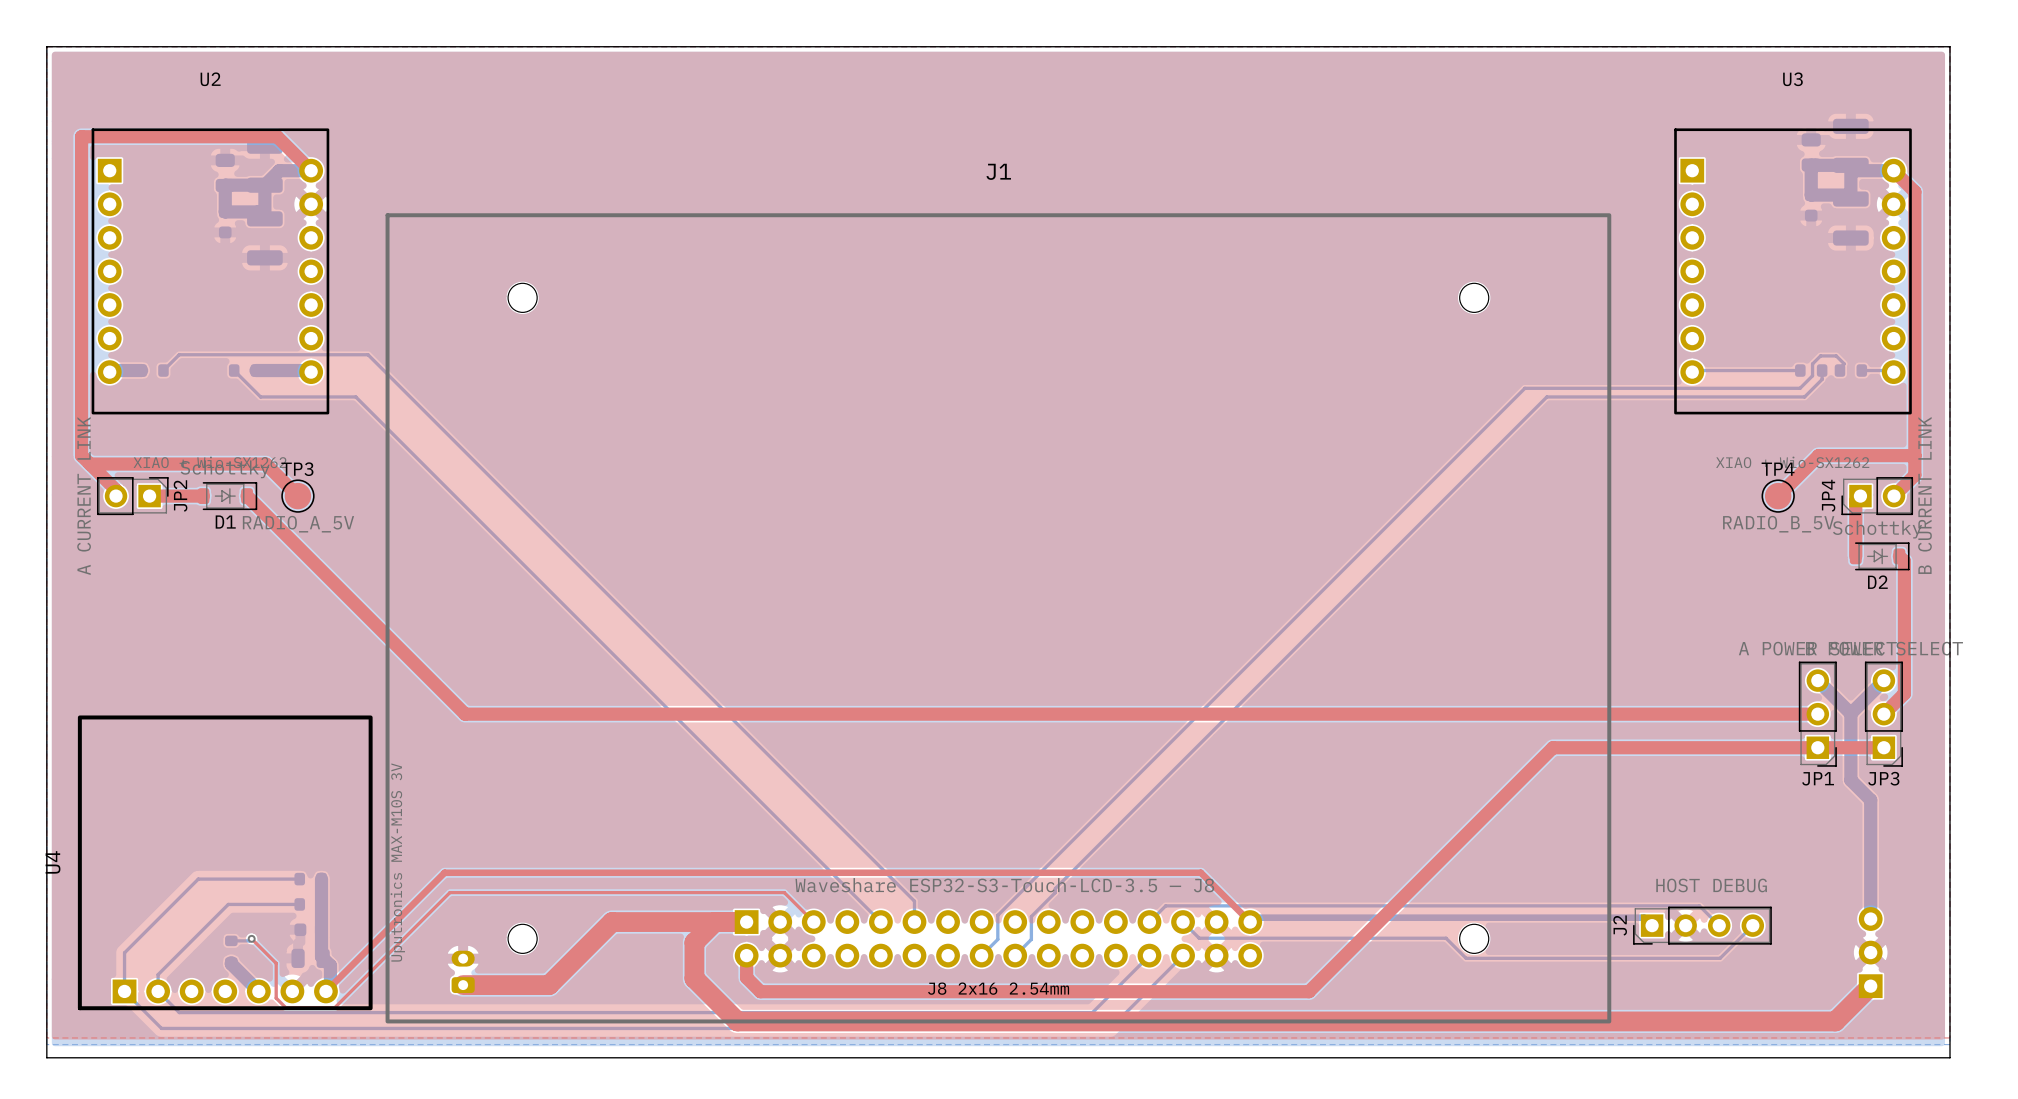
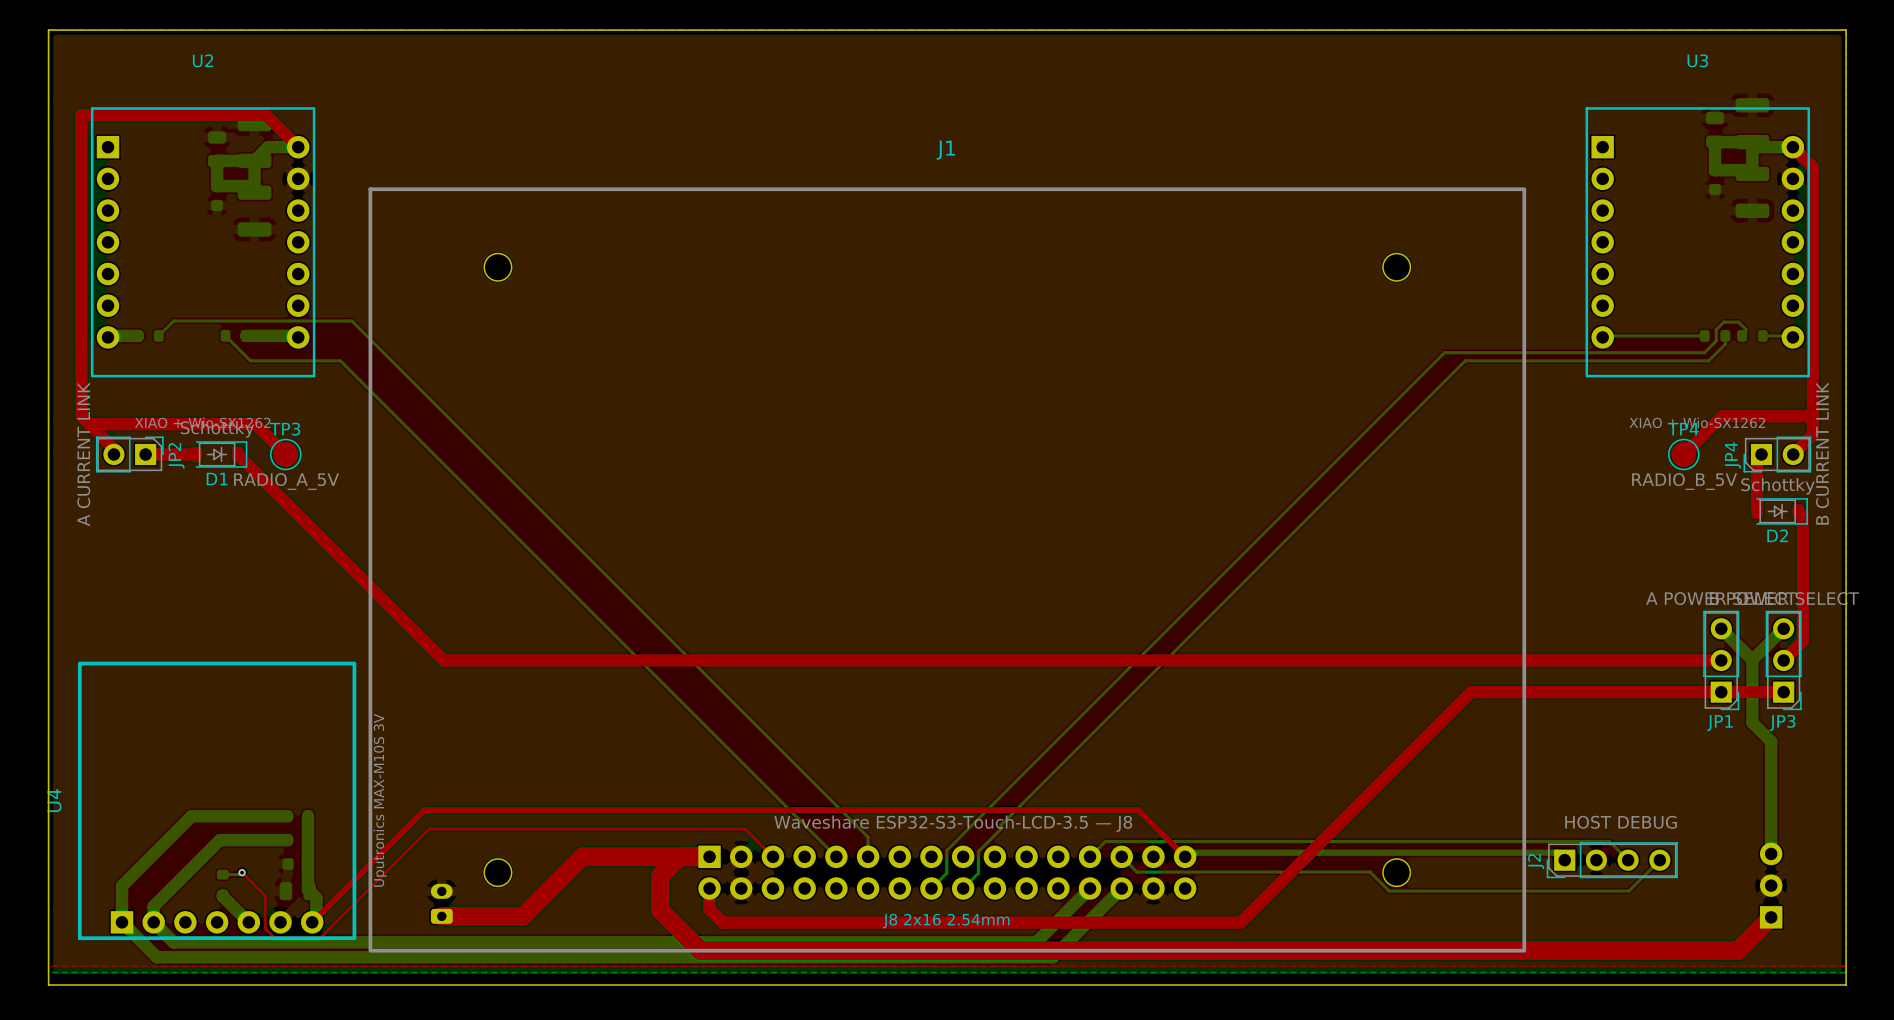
bottom track width: thin (299, 879) (198, 879) (124, 952) (124, 991) (161, 1028) (1110, 1028) (1183, 955) -> thick (287, 816) (191, 816) (121, 885) (121, 922) (156, 957) (1052, 957) (1121, 888)
bottom track width: thin (299, 904) (228, 904) (158, 974) (158, 991) (179, 1012) (1092, 1012) (1149, 955) -> thick (287, 840) (219, 840) (153, 906) (153, 922) (173, 942) (1036, 942) (1090, 888)

